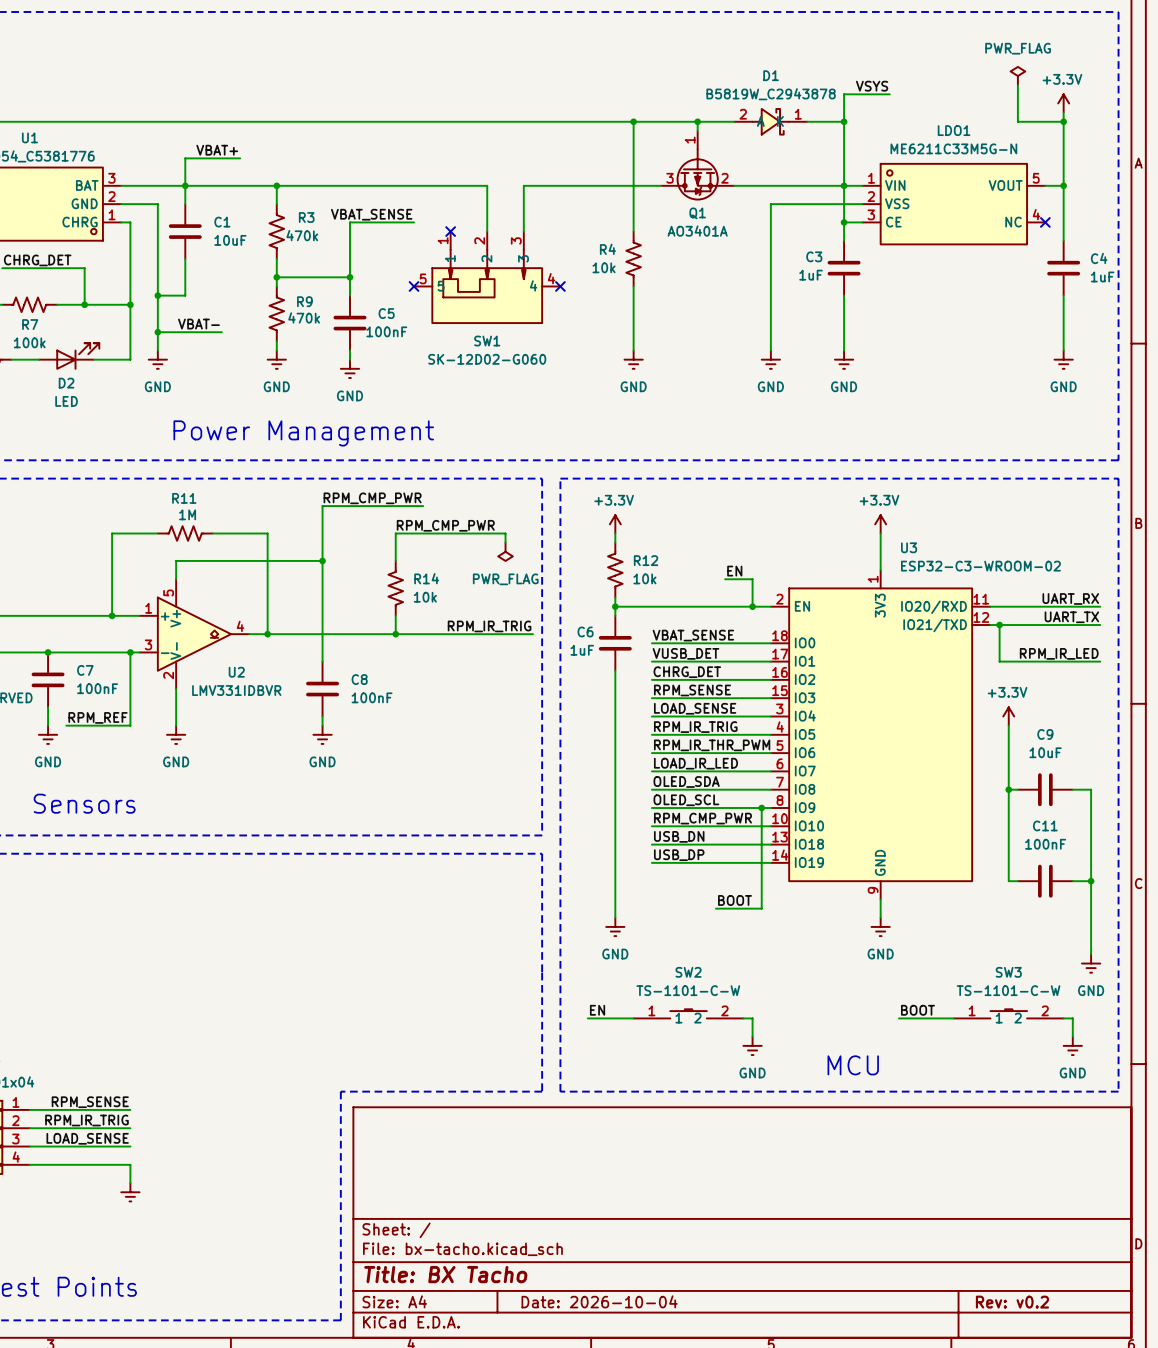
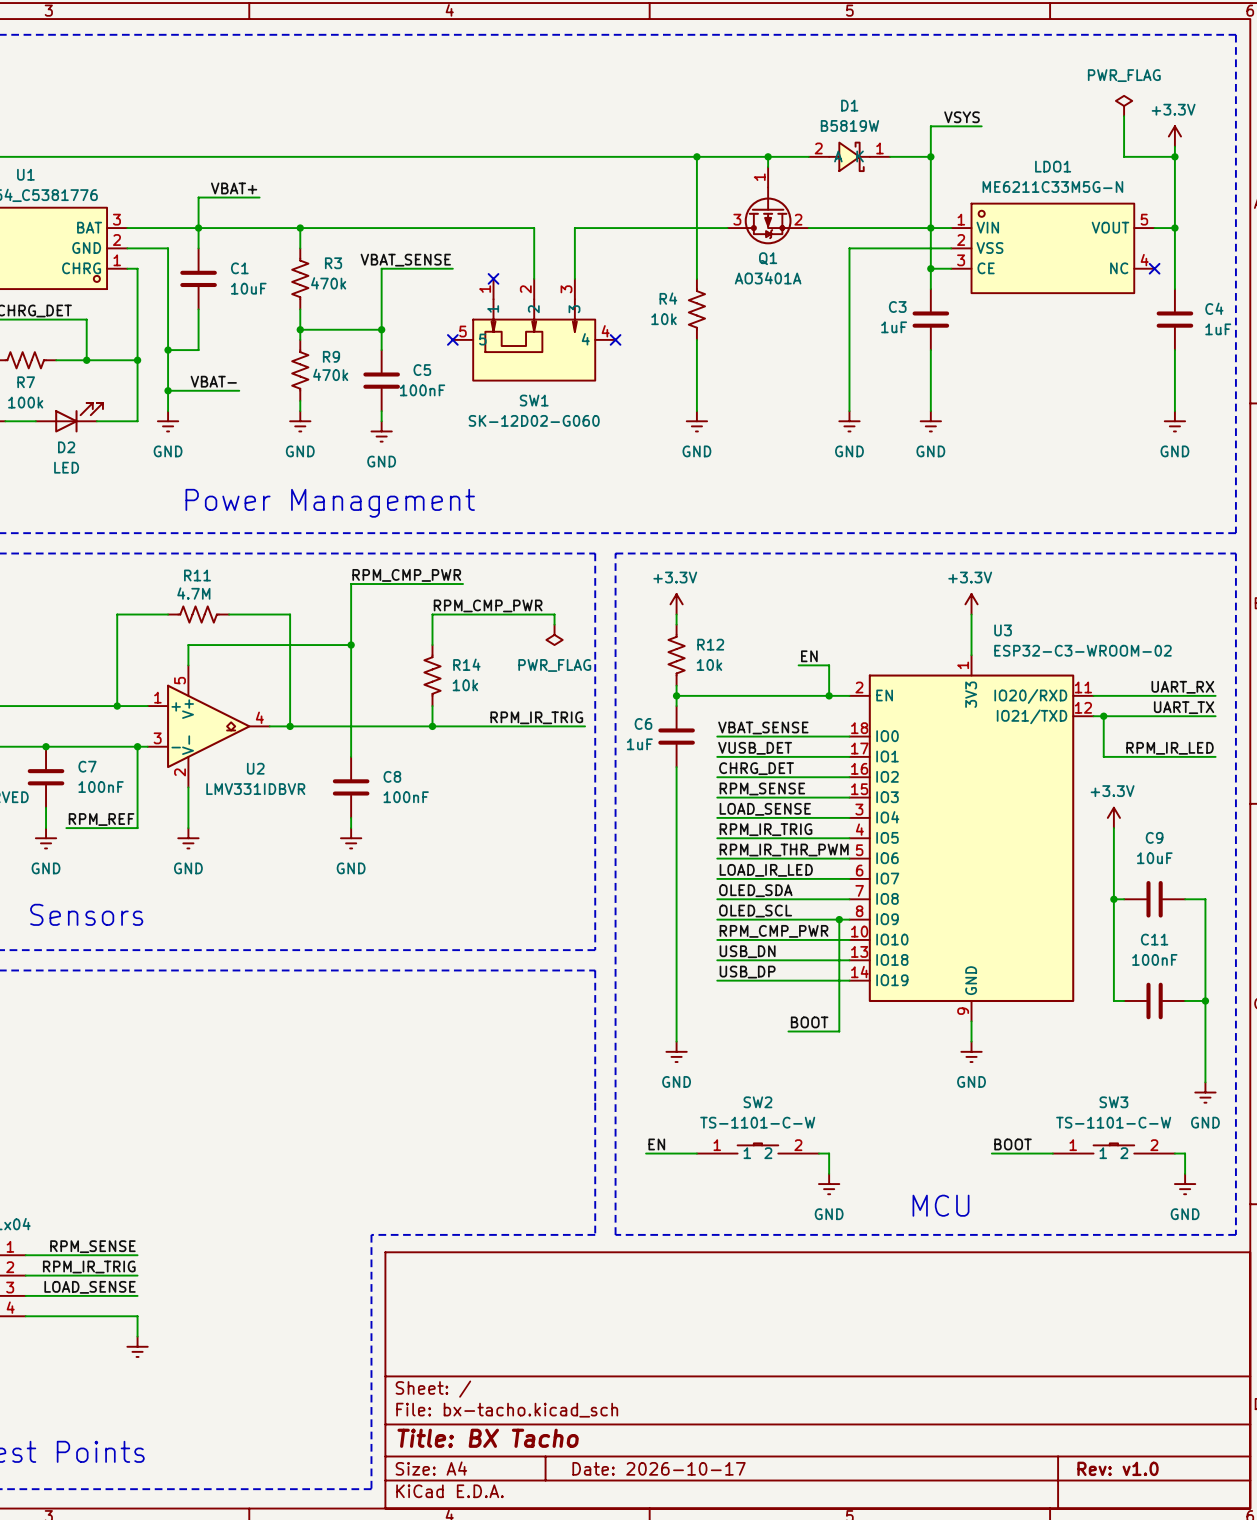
D1 value: B5819W_C2943878 (771, 94) -> B5819W (849, 125)
R11 value: 1M (187, 514) -> 4.7M (193, 593)
title block: Date: 2026-10-04 (599, 1301) -> Date: 2026-10-17 (659, 1468)
title block: Rev: v0.2 (1012, 1302) -> Rev: v1.0 (1118, 1468)

